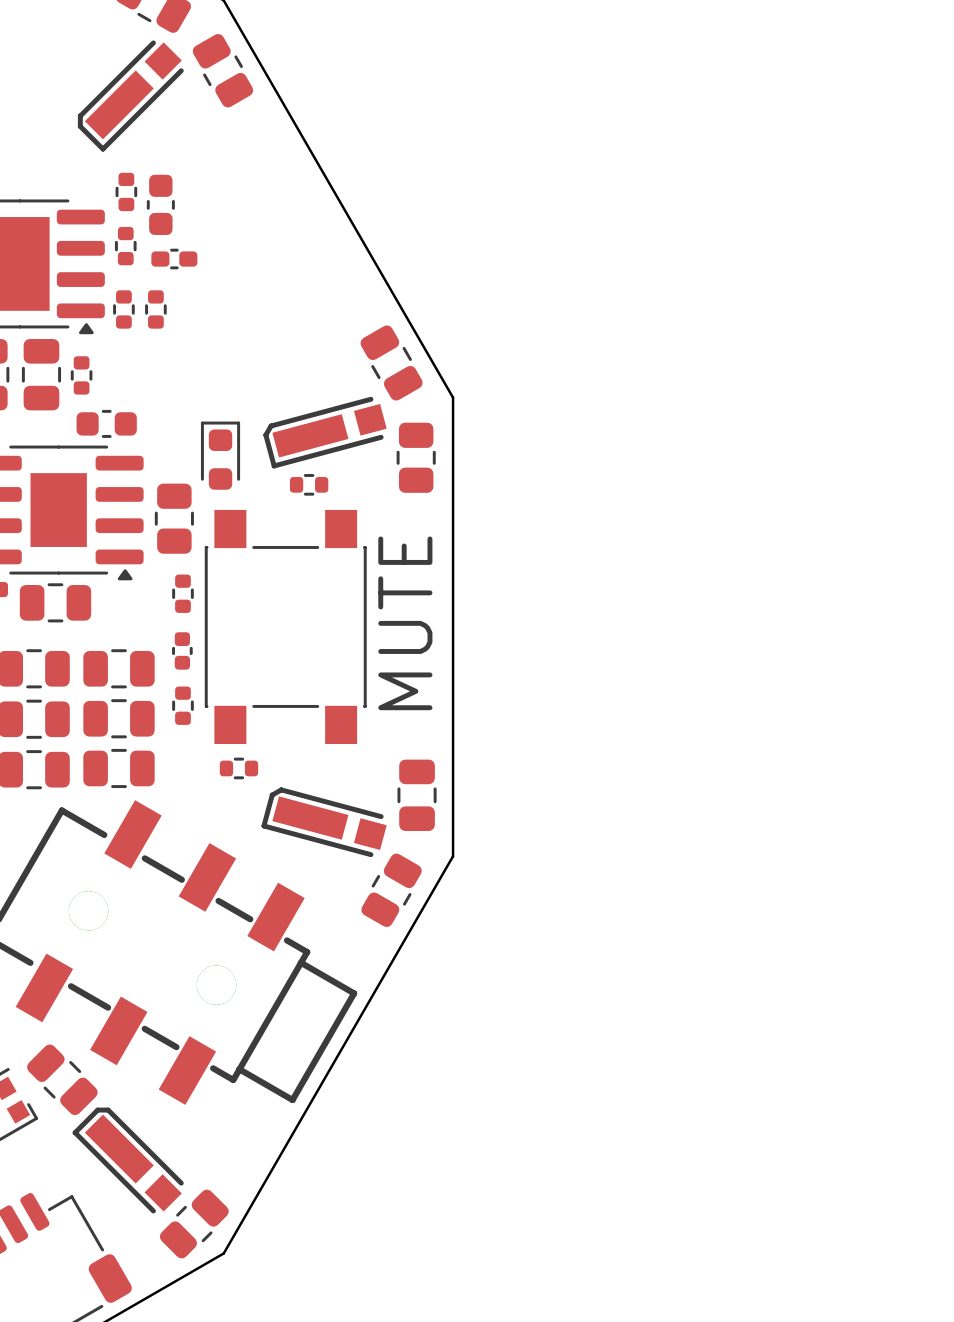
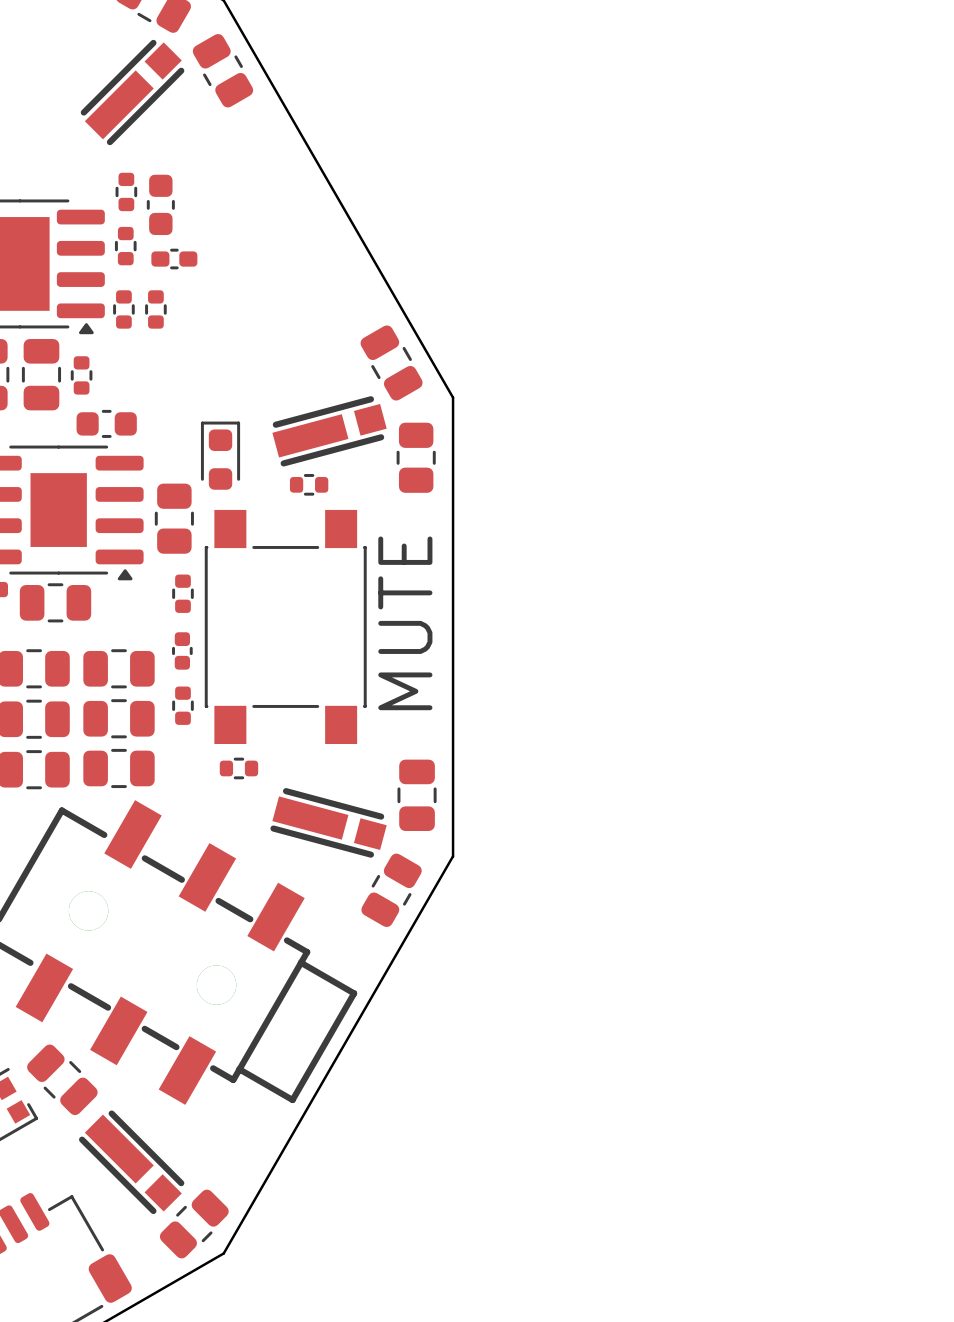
part footprint: [77, 40, 184, 152] -> [80, 39, 185, 146]
part footprint: [263, 396, 387, 469] -> [272, 396, 387, 467]
part footprint: [261, 787, 387, 858] -> [270, 788, 387, 858]
part footprint: [72, 1107, 184, 1214] -> [79, 1110, 185, 1215]

